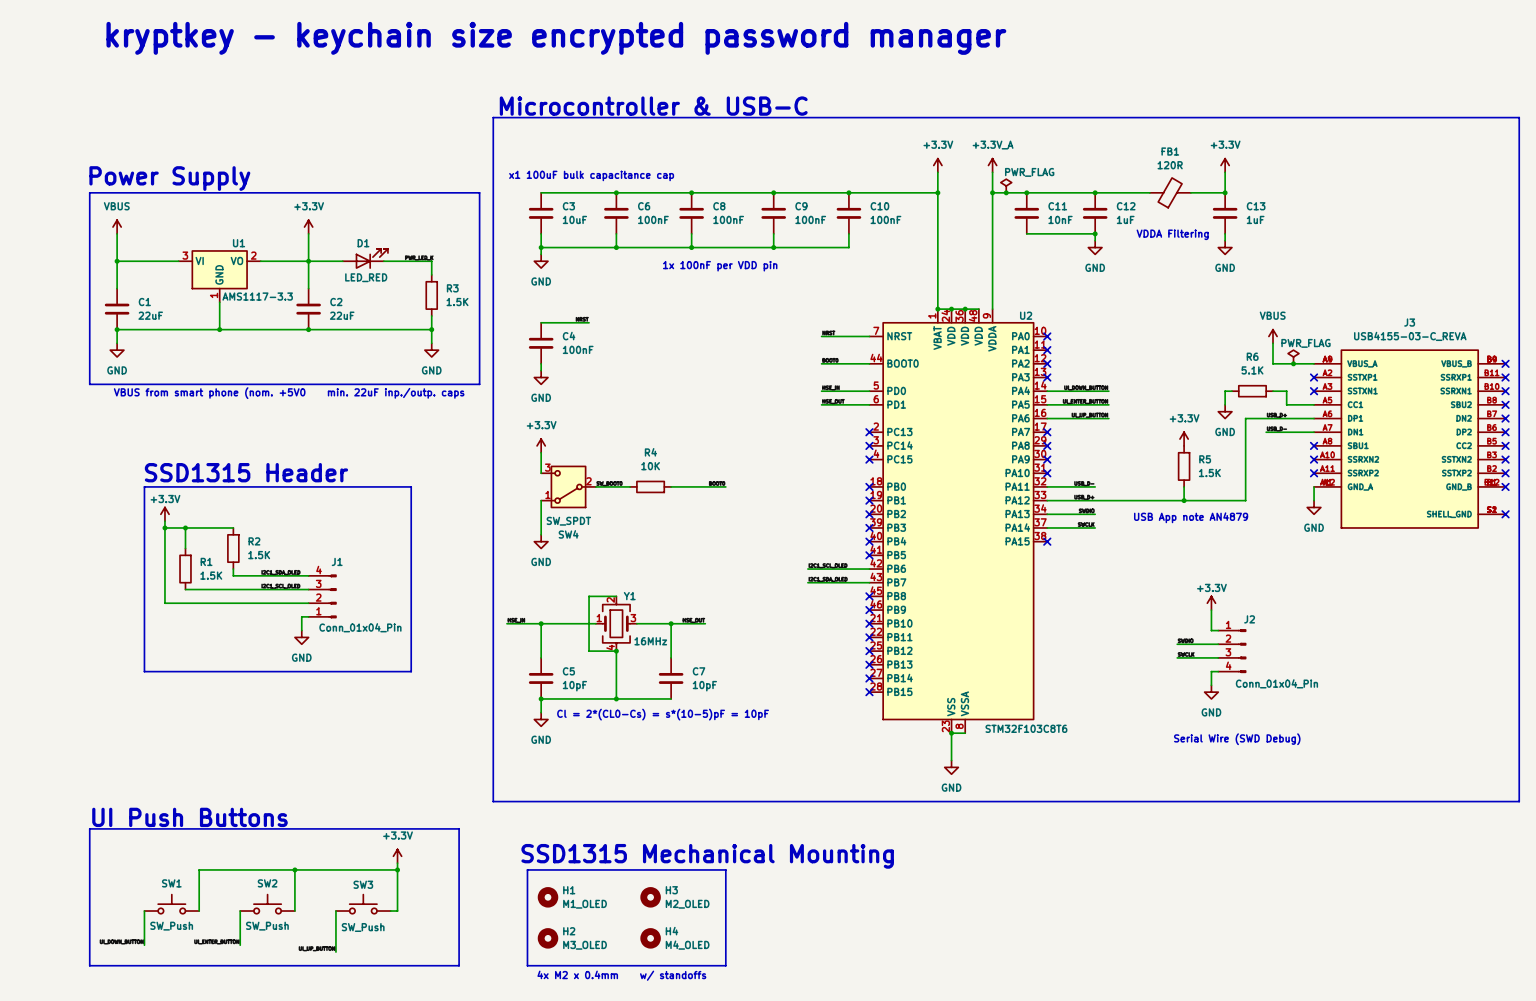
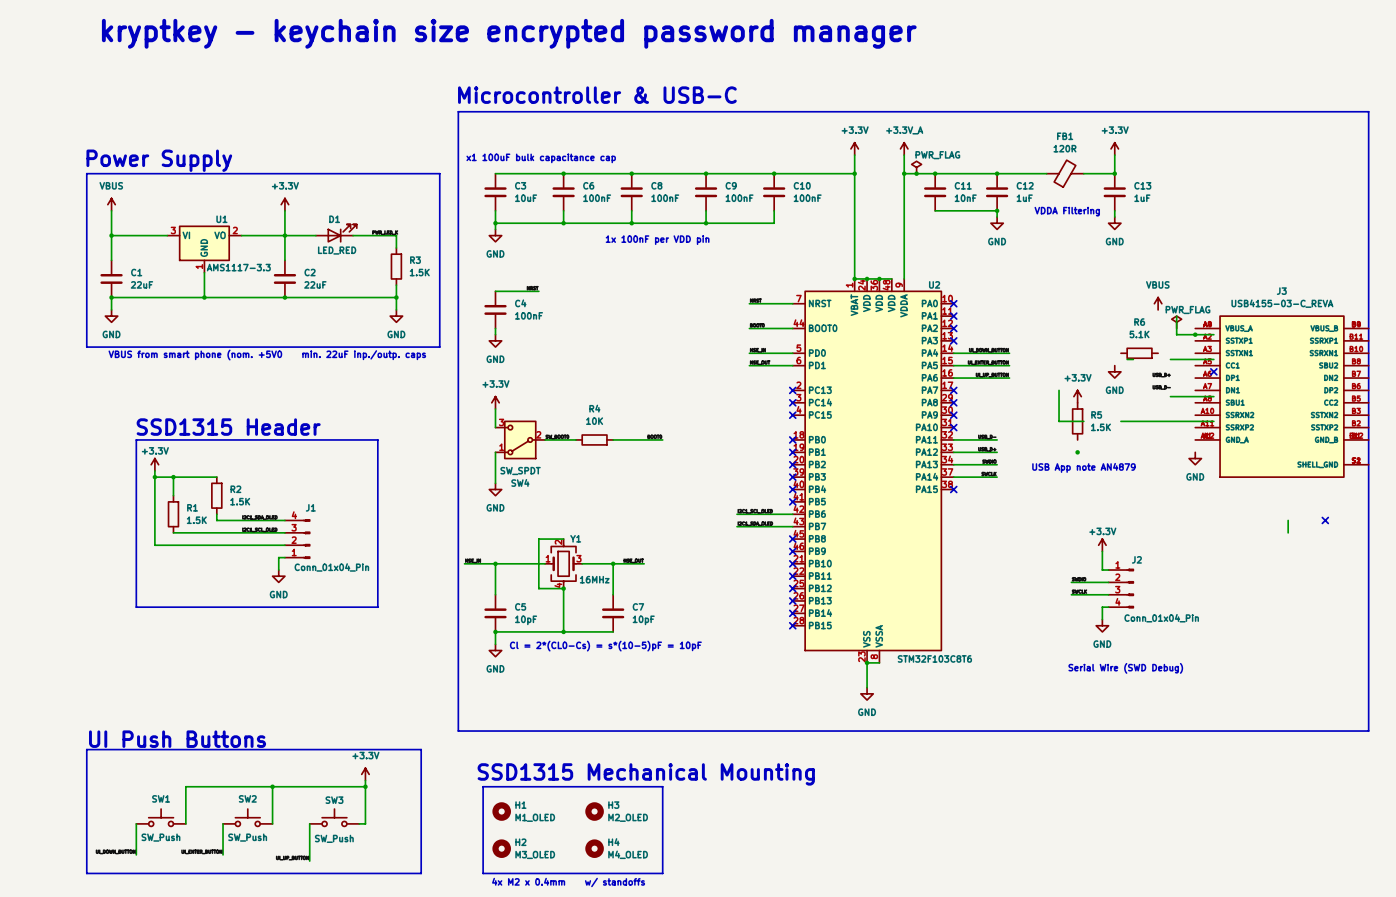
line: (493, 117) (1519, 117) (1519, 801) (493, 801) (493, 117) -> (458, 111) (458, 731) (1368, 731) (1368, 111) (458, 111)
wire: (1273, 343) (1273, 363) (1314, 363) -> (1176, 316) (1176, 334) (1213, 334)
junction position: (1293, 363) -> (1195, 334)
no-connect mark: (1505, 363) -> none
no-connect mark: (1314, 377) -> none
no-connect mark: (1505, 377) -> none
wire: (1231, 391) (1225, 391) (1225, 404) -> none
wire: (1273, 391) (1286, 391) (1286, 404) (1314, 404) -> none
no-connect mark: (1314, 391) -> none
no-connect mark: (1505, 391) -> none
wire: none -> (1127, 359) (1133, 359)
wire: none -> (1170, 359) (1213, 359)
no-connect mark: (1505, 404) -> none
no-connect mark: none -> (1213, 371)
wire: (1314, 418) (1245, 418) (1245, 500) (1095, 500) -> none
no-connect mark: (1505, 418) -> none
wire: none -> (1059, 390) (1059, 421) (1083, 421)
wire: (1266, 432) (1314, 432) -> (1170, 396) (1213, 396)
no-connect mark: (1505, 432) -> none
no-connect mark: (1314, 445) -> none
no-connect mark: (1505, 445) -> none
no-connect mark: (1314, 459) -> none
no-connect mark: (1505, 459) -> none
wire: none -> (1120, 421) (1213, 421)
no-connect mark: (1314, 473) -> none
no-connect mark: (1505, 473) -> none
wire: (1184, 486) (1184, 500) -> none
wire: (1314, 486) (1314, 500) -> none
no-connect mark: (1505, 486) -> none
no-connect mark: (1505, 514) -> none
wire: none -> (1288, 520) (1288, 532)
no-connect mark: none -> (1325, 520)

